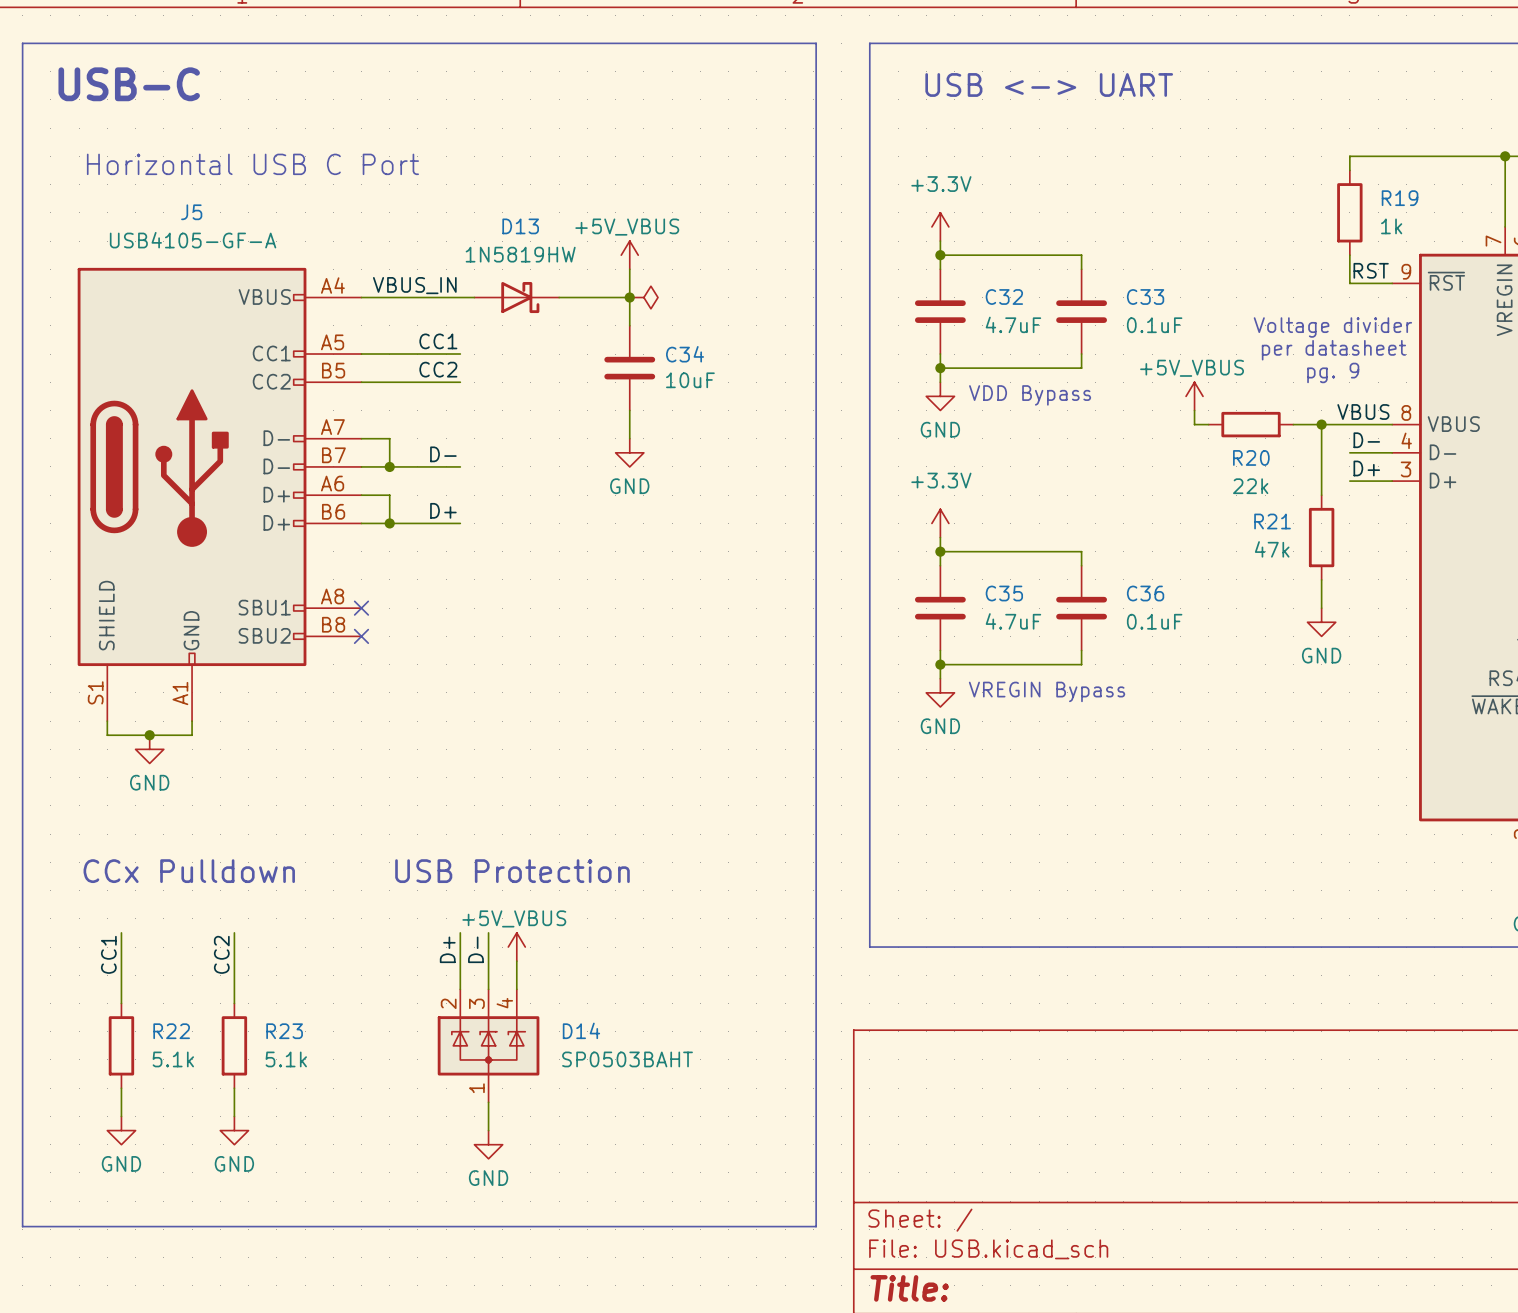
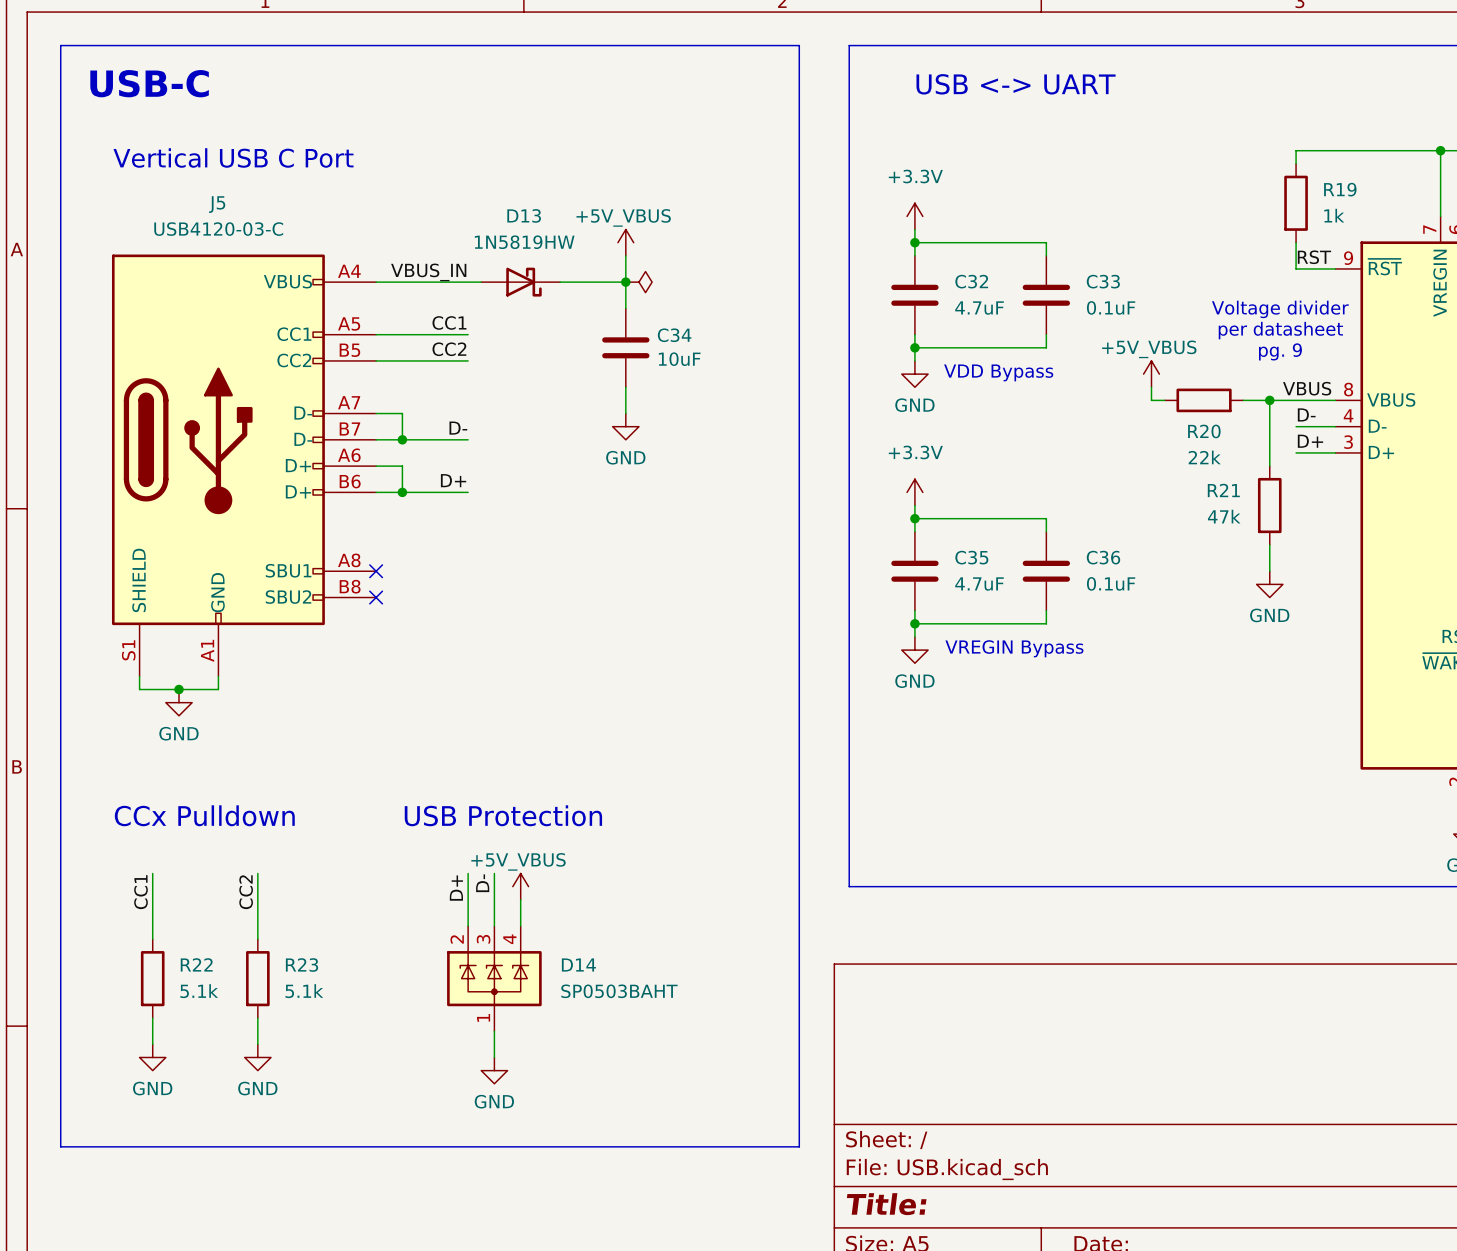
text: Horizontal USB C Port (252, 164) -> Vertical USB C Port (233, 157)
J5 value: USB4105-GF-A (193, 240) -> USB4120-03-C (218, 229)

